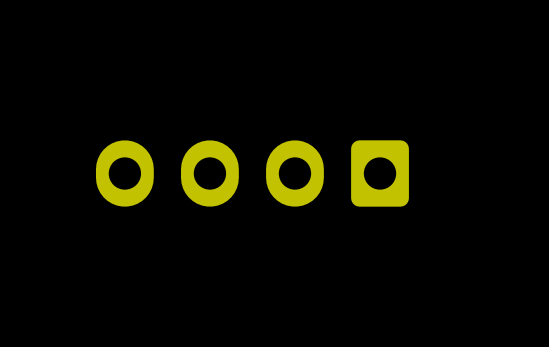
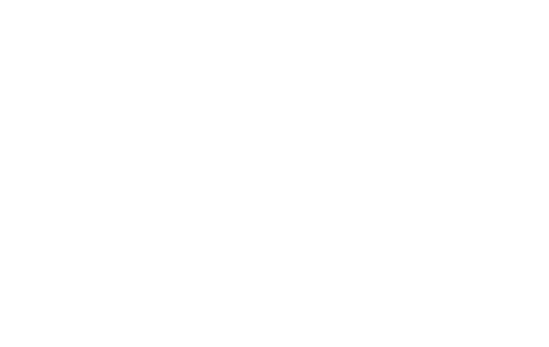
part: (252, 173) -> none

